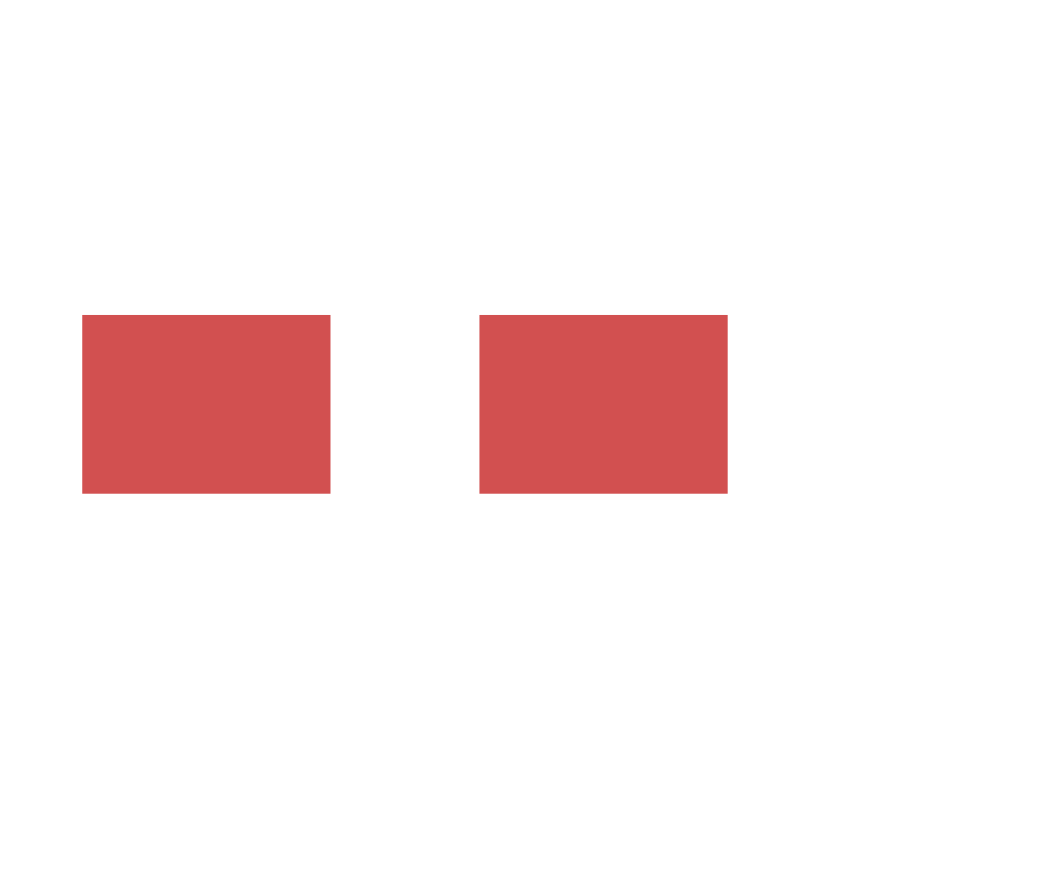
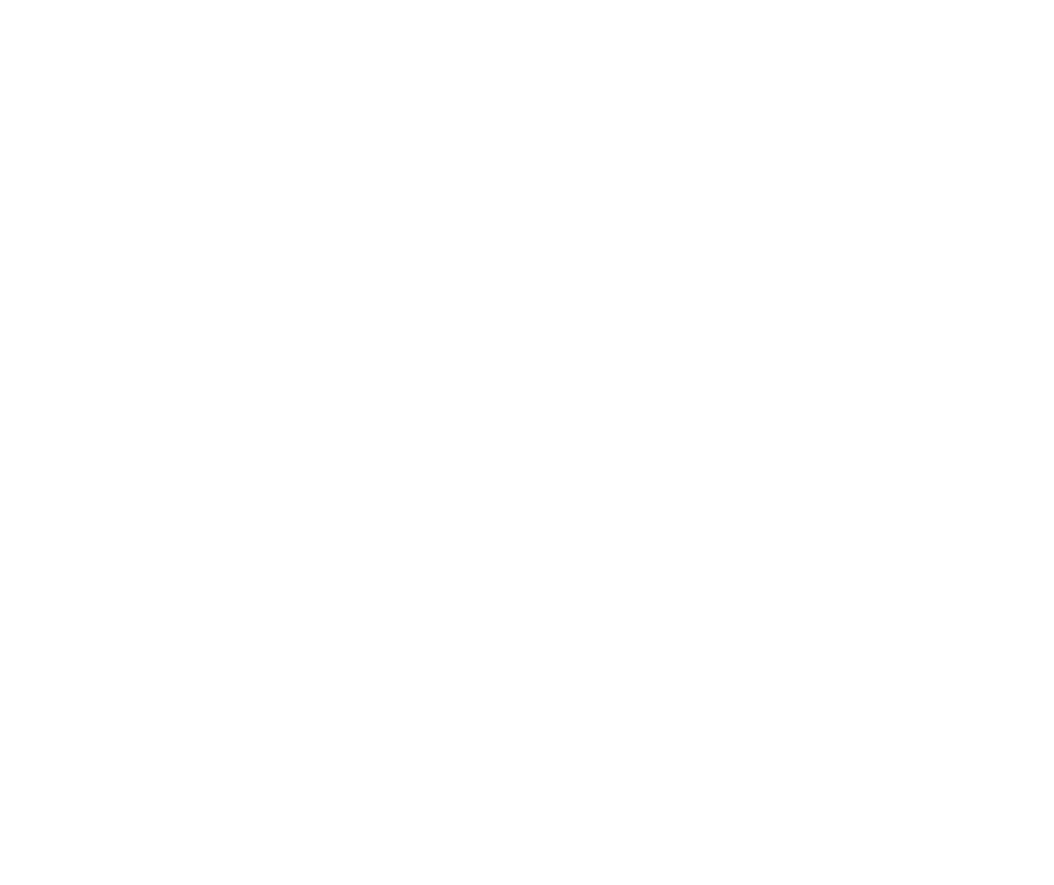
part: (404, 404) -> none

